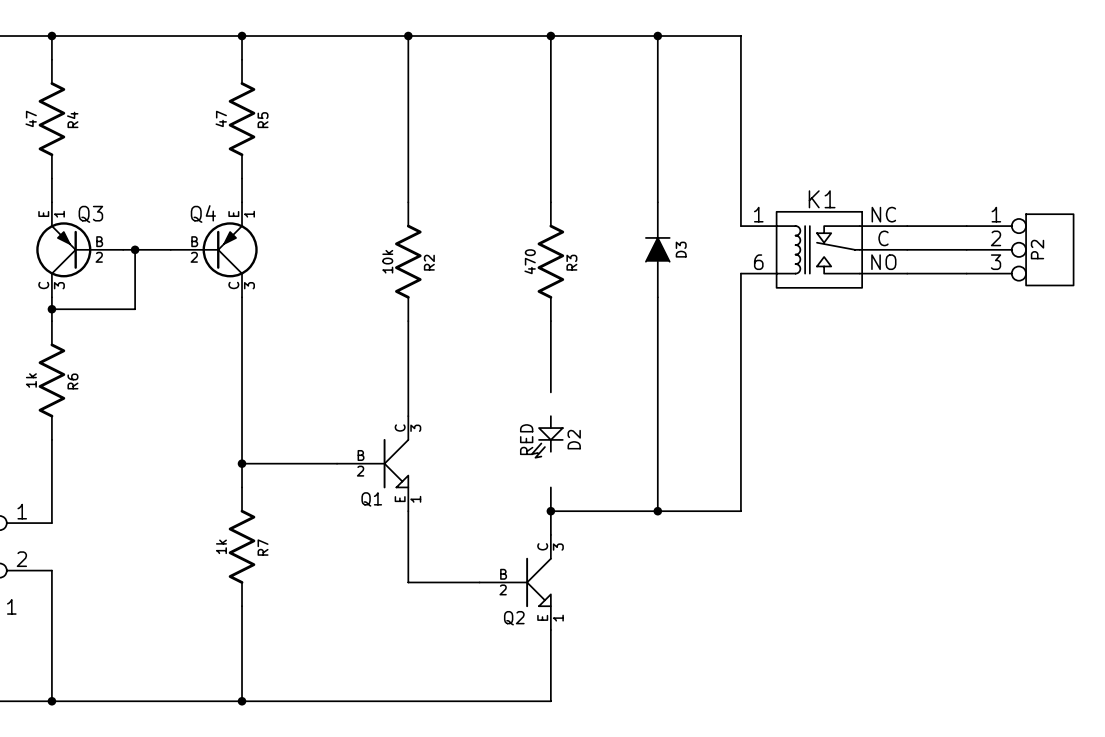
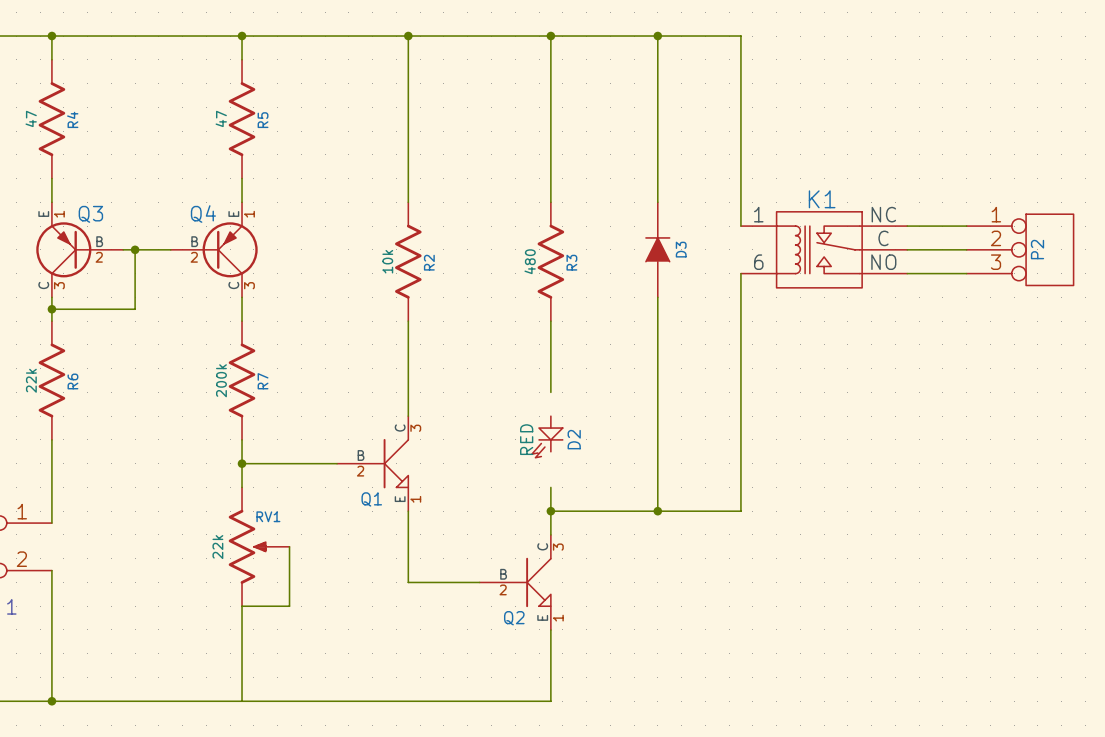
R3 value: 470 (530, 261) -> 480 (530, 261)
R6 value: 1k (31, 380) -> 22k (31, 380)
R7 value: 1k (221, 546) -> 200k (221, 380)
R7 position: (242, 546) -> (242, 380)
RV1: none -> 22k (259, 546)
wire: none -> (289, 546) (289, 606) (242, 606)
junction: (242, 701) -> none

